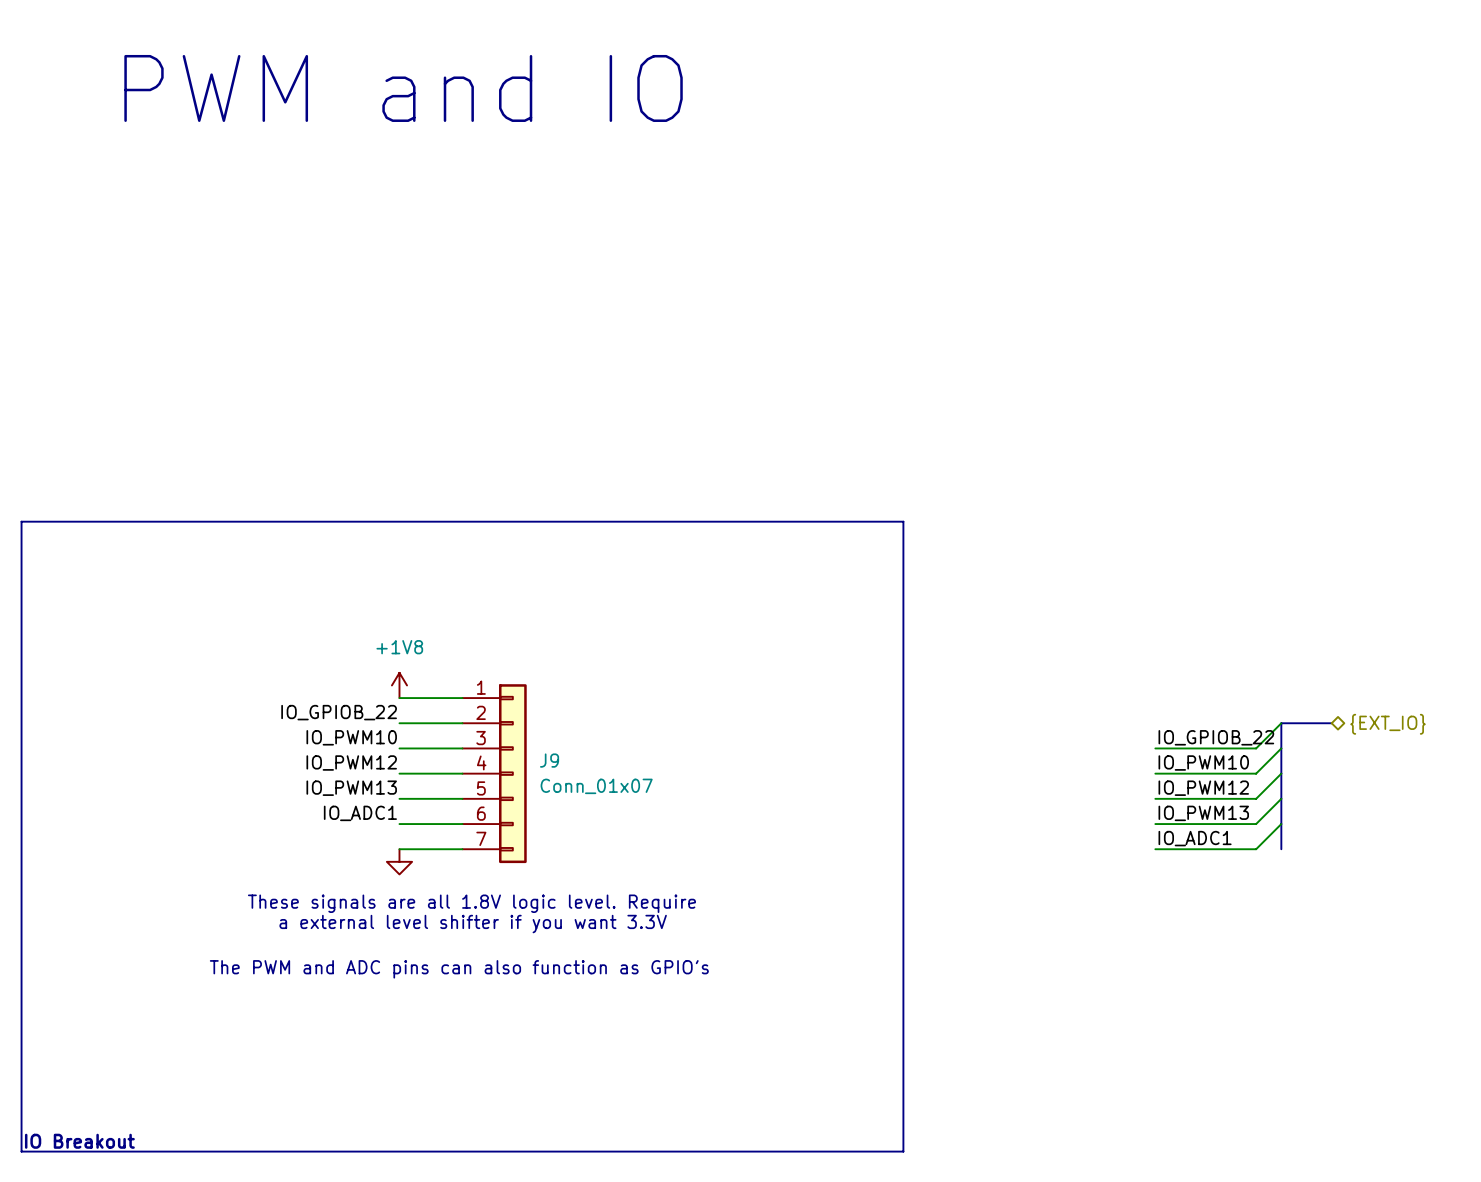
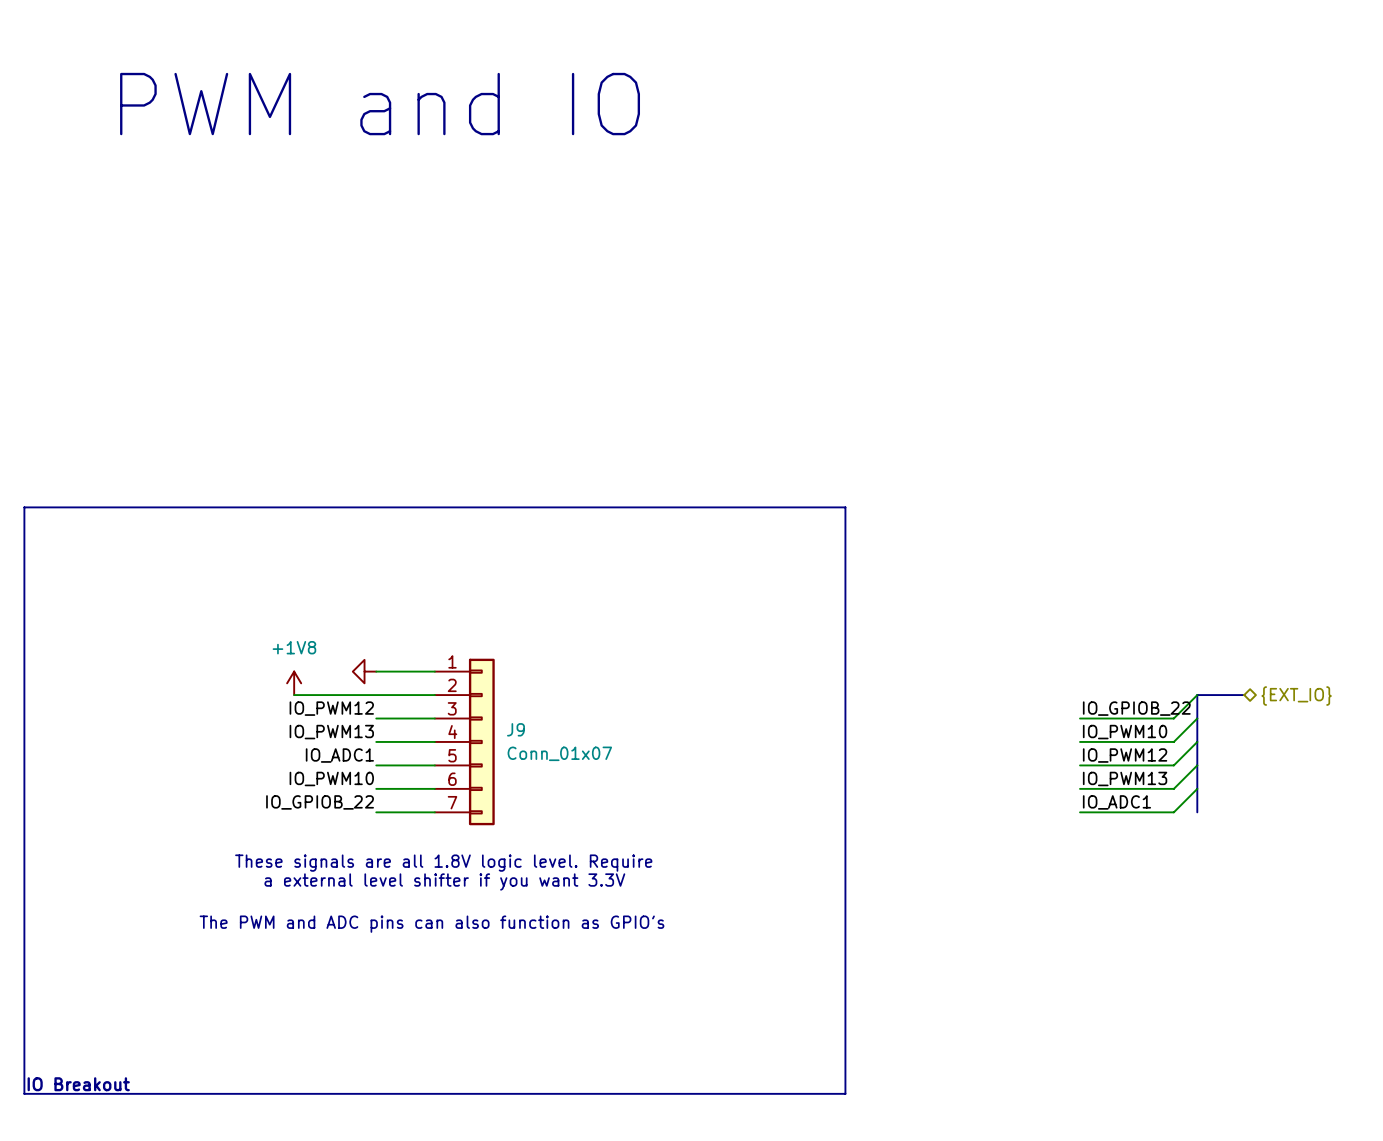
power symbol position: +1V8 (399, 685) -> +1V8 (294, 683)
label position: IO_GPIOB_22 (339, 712) -> IO_GPIOB_22 (320, 802)
wire: none -> (294, 695) (376, 695)
label: IO_PWM10 (351, 737) -> IO_PWM12 (331, 708)
label: IO_PWM12 (351, 763) -> IO_PWM13 (331, 732)
label: IO_PWM13 (351, 788) -> IO_ADC1 (339, 755)
label: IO_ADC1 (360, 813) -> IO_PWM10 (331, 778)
power symbol rotation: 0° (399, 861) -> 90° clockwise (364, 671)
power symbol position: (399, 861) -> (364, 671)

